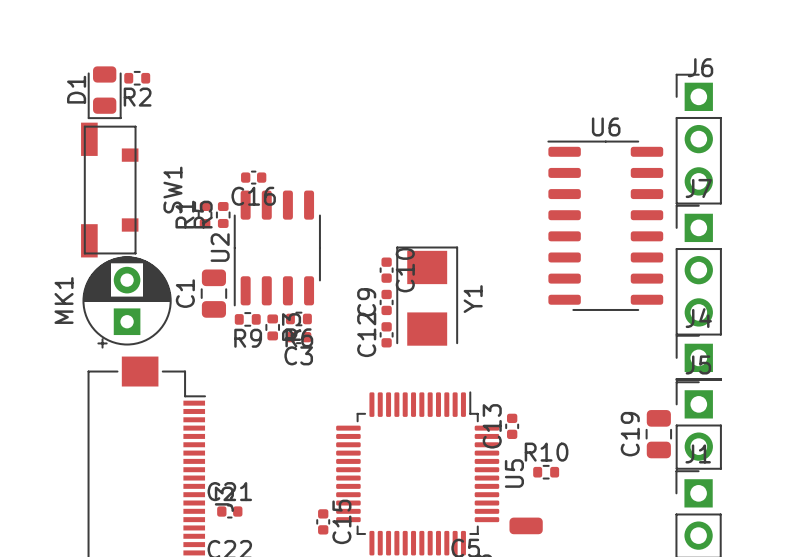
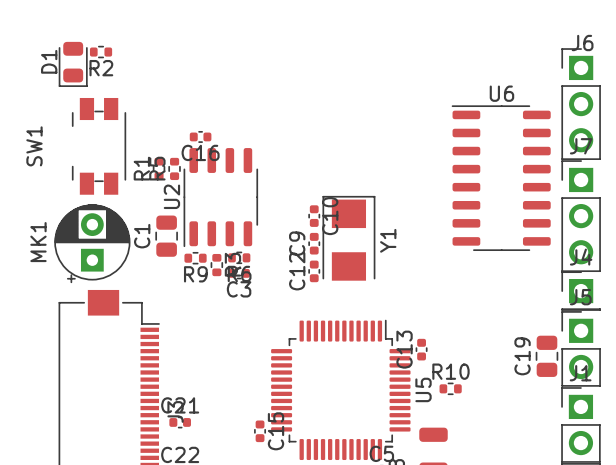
SW1 footprint: [81, 122, 139, 258] -> [71, 97, 127, 195]
SW1 name position: SW1 (172, 190) -> SW1 (34, 146)

